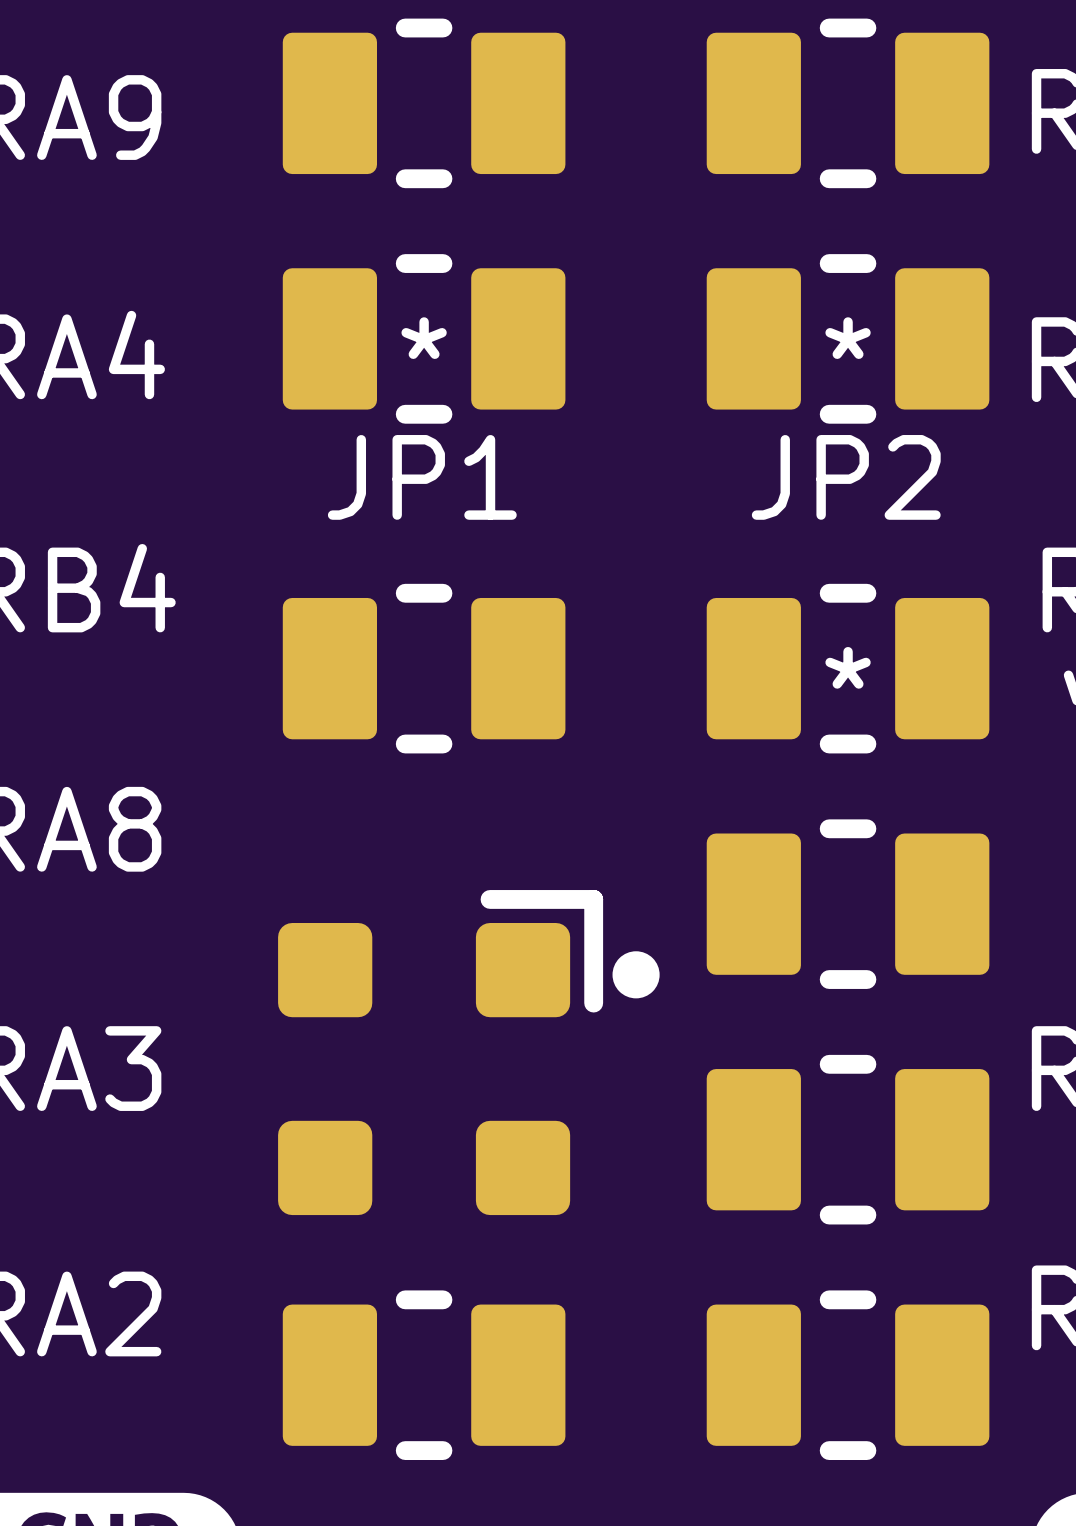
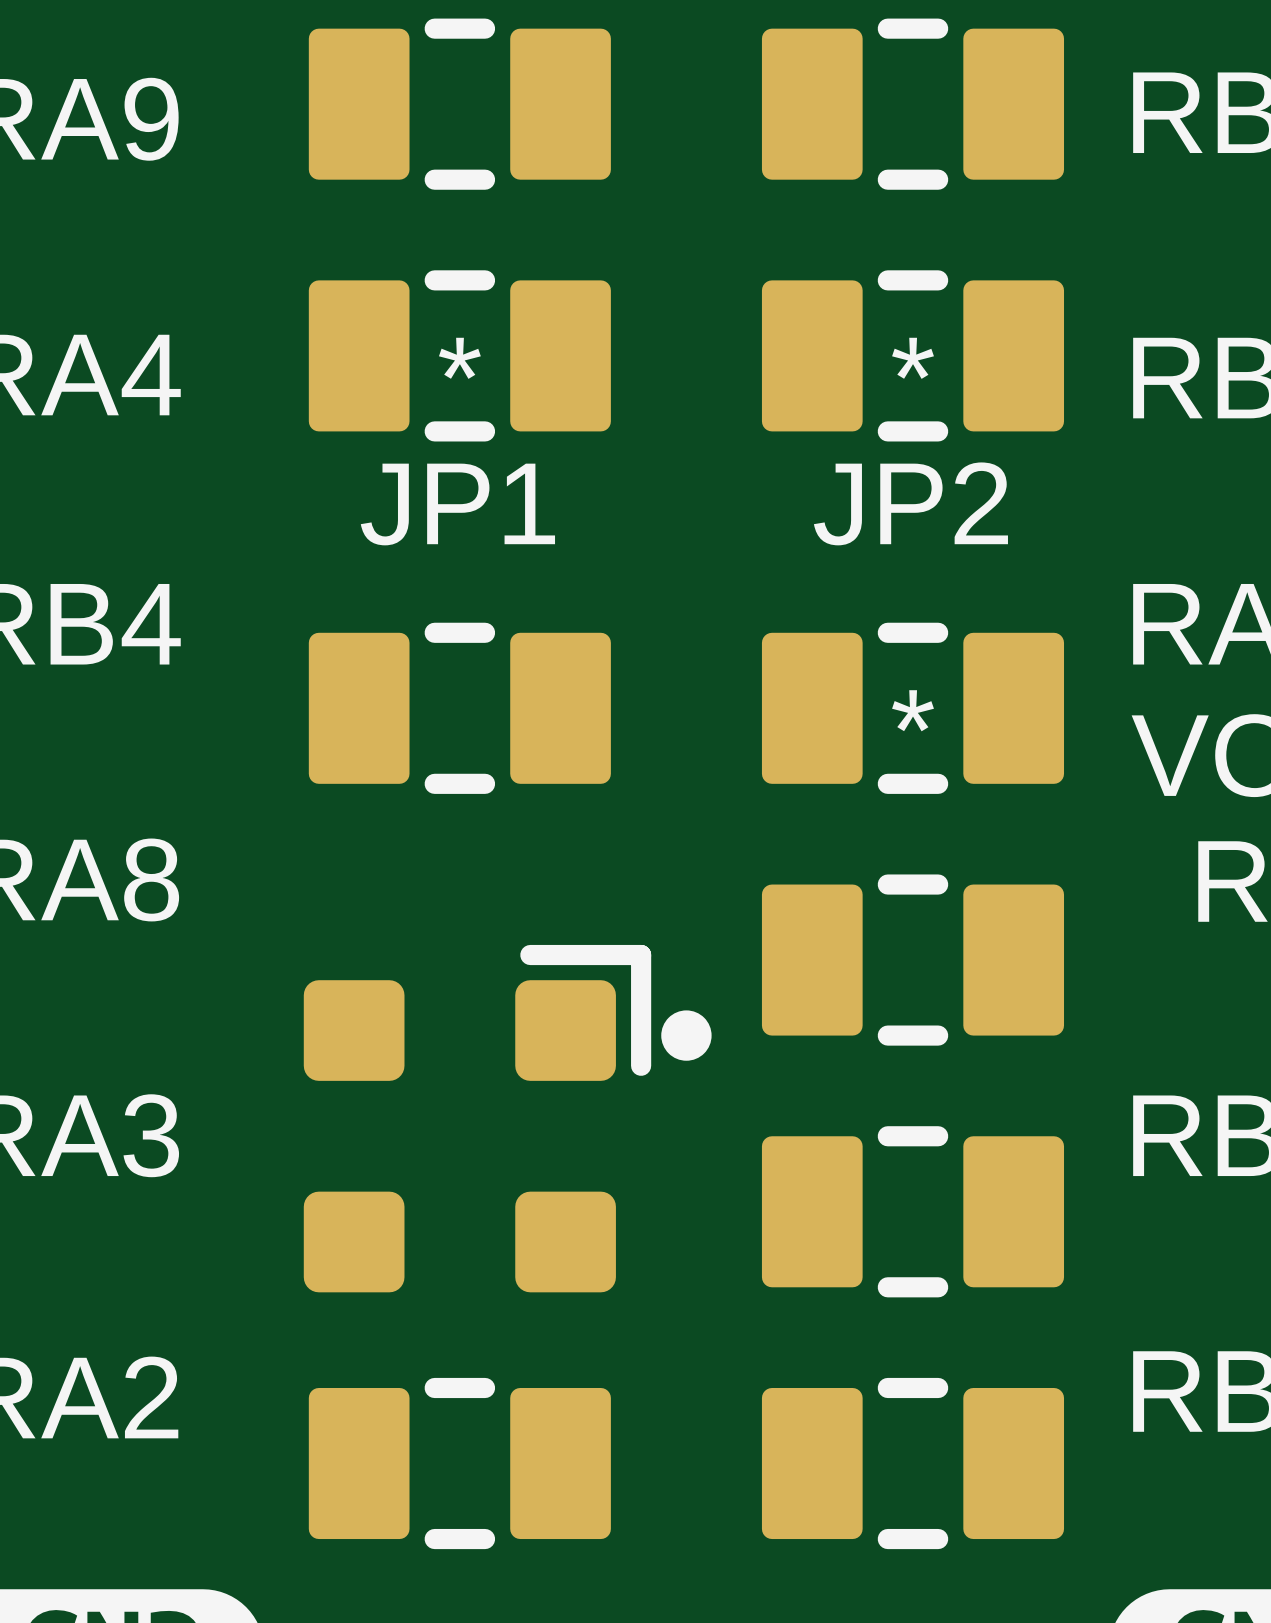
part footprint: [282, 18, 566, 189] -> [308, 18, 611, 190]
part footprint: [706, 18, 990, 189] -> [761, 18, 1065, 190]
part footprint: [282, 254, 566, 424] -> [308, 270, 611, 442]
part footprint: [706, 254, 990, 424] -> [761, 270, 1065, 442]
part footprint: [282, 583, 566, 754] -> [308, 622, 611, 794]
part footprint: [706, 583, 990, 754] -> [761, 622, 1065, 794]
part footprint: [706, 819, 990, 989] -> [761, 874, 1065, 1046]
part footprint: [706, 1054, 990, 1225] -> [761, 1126, 1065, 1298]
part footprint: [282, 1290, 566, 1460] -> [308, 1377, 611, 1550]
part footprint: [706, 1290, 990, 1460] -> [761, 1377, 1065, 1550]

